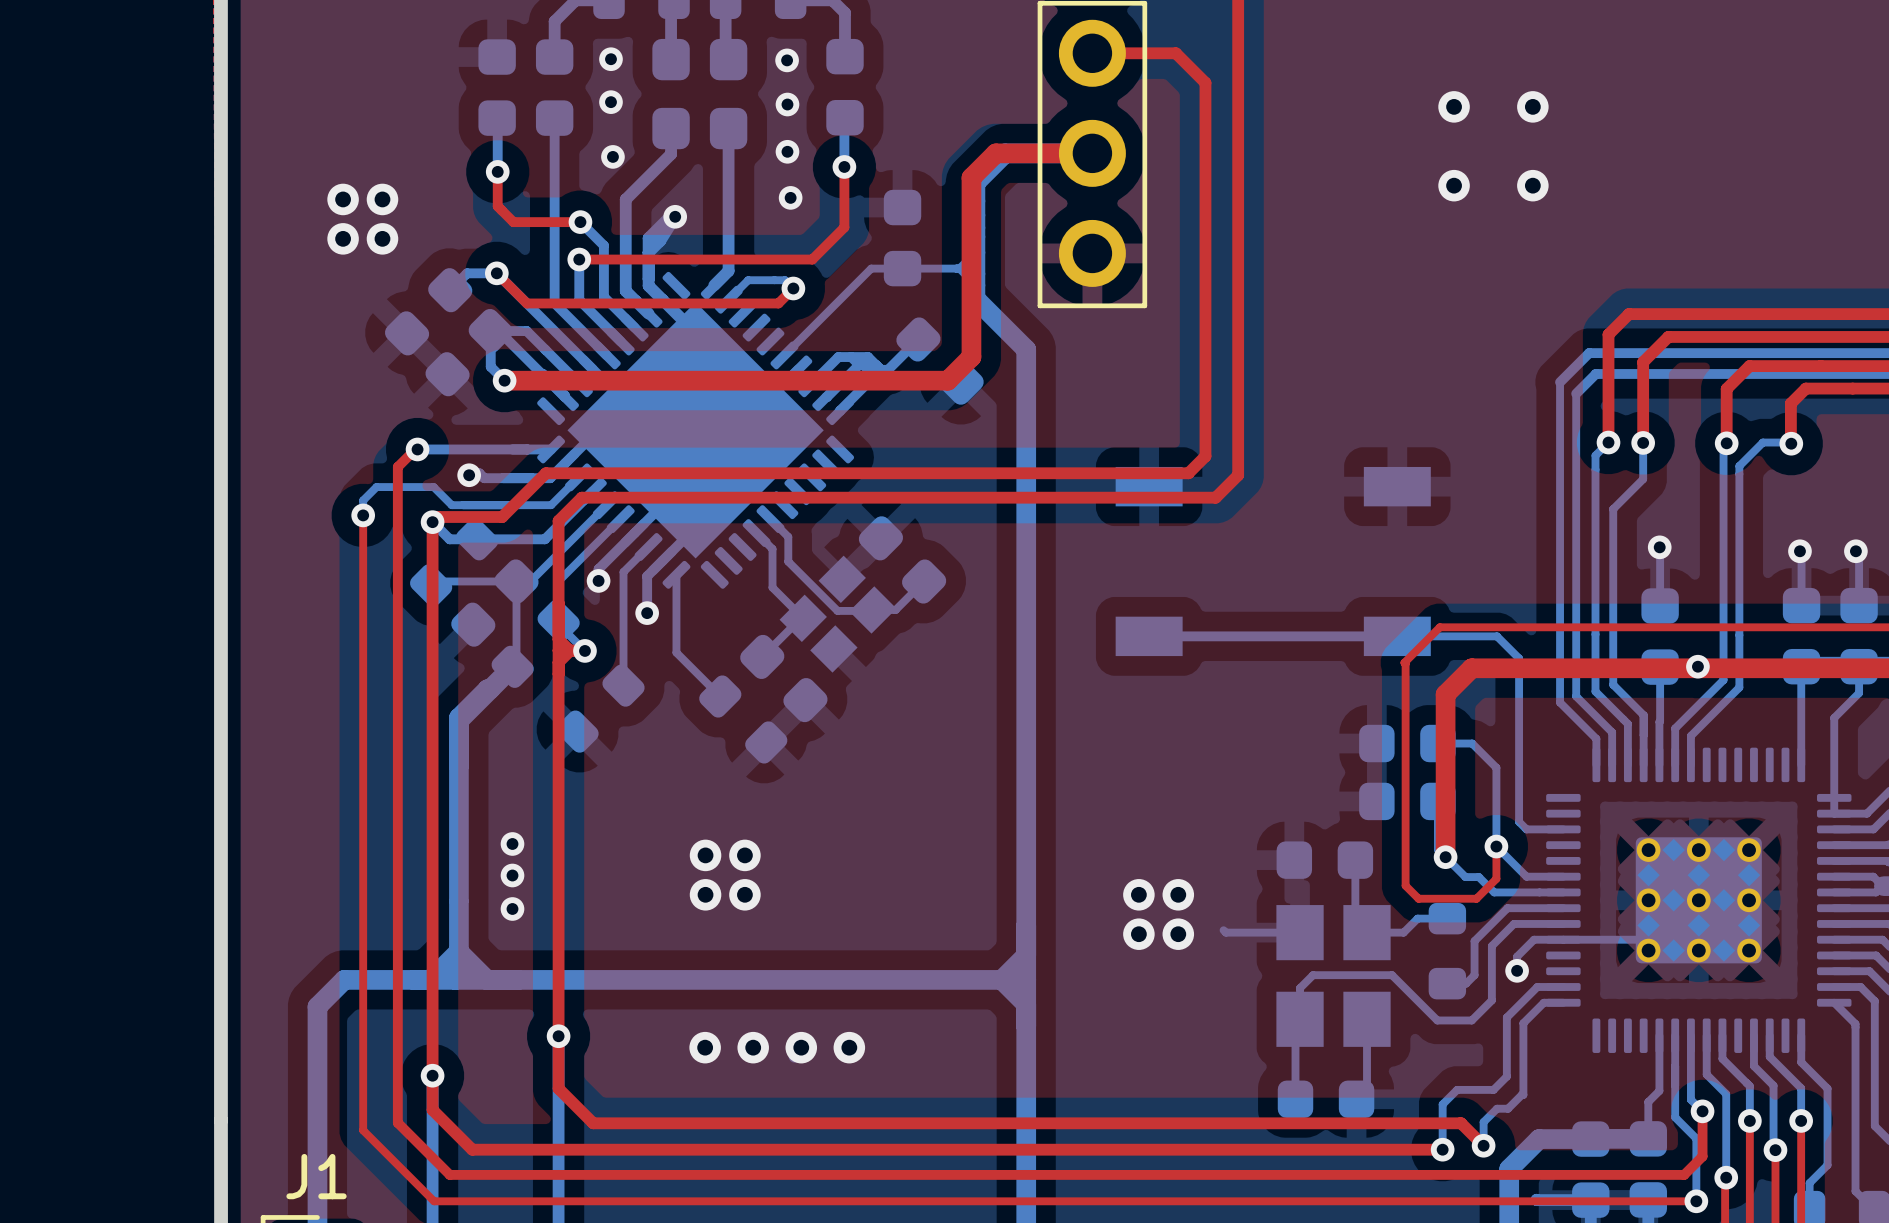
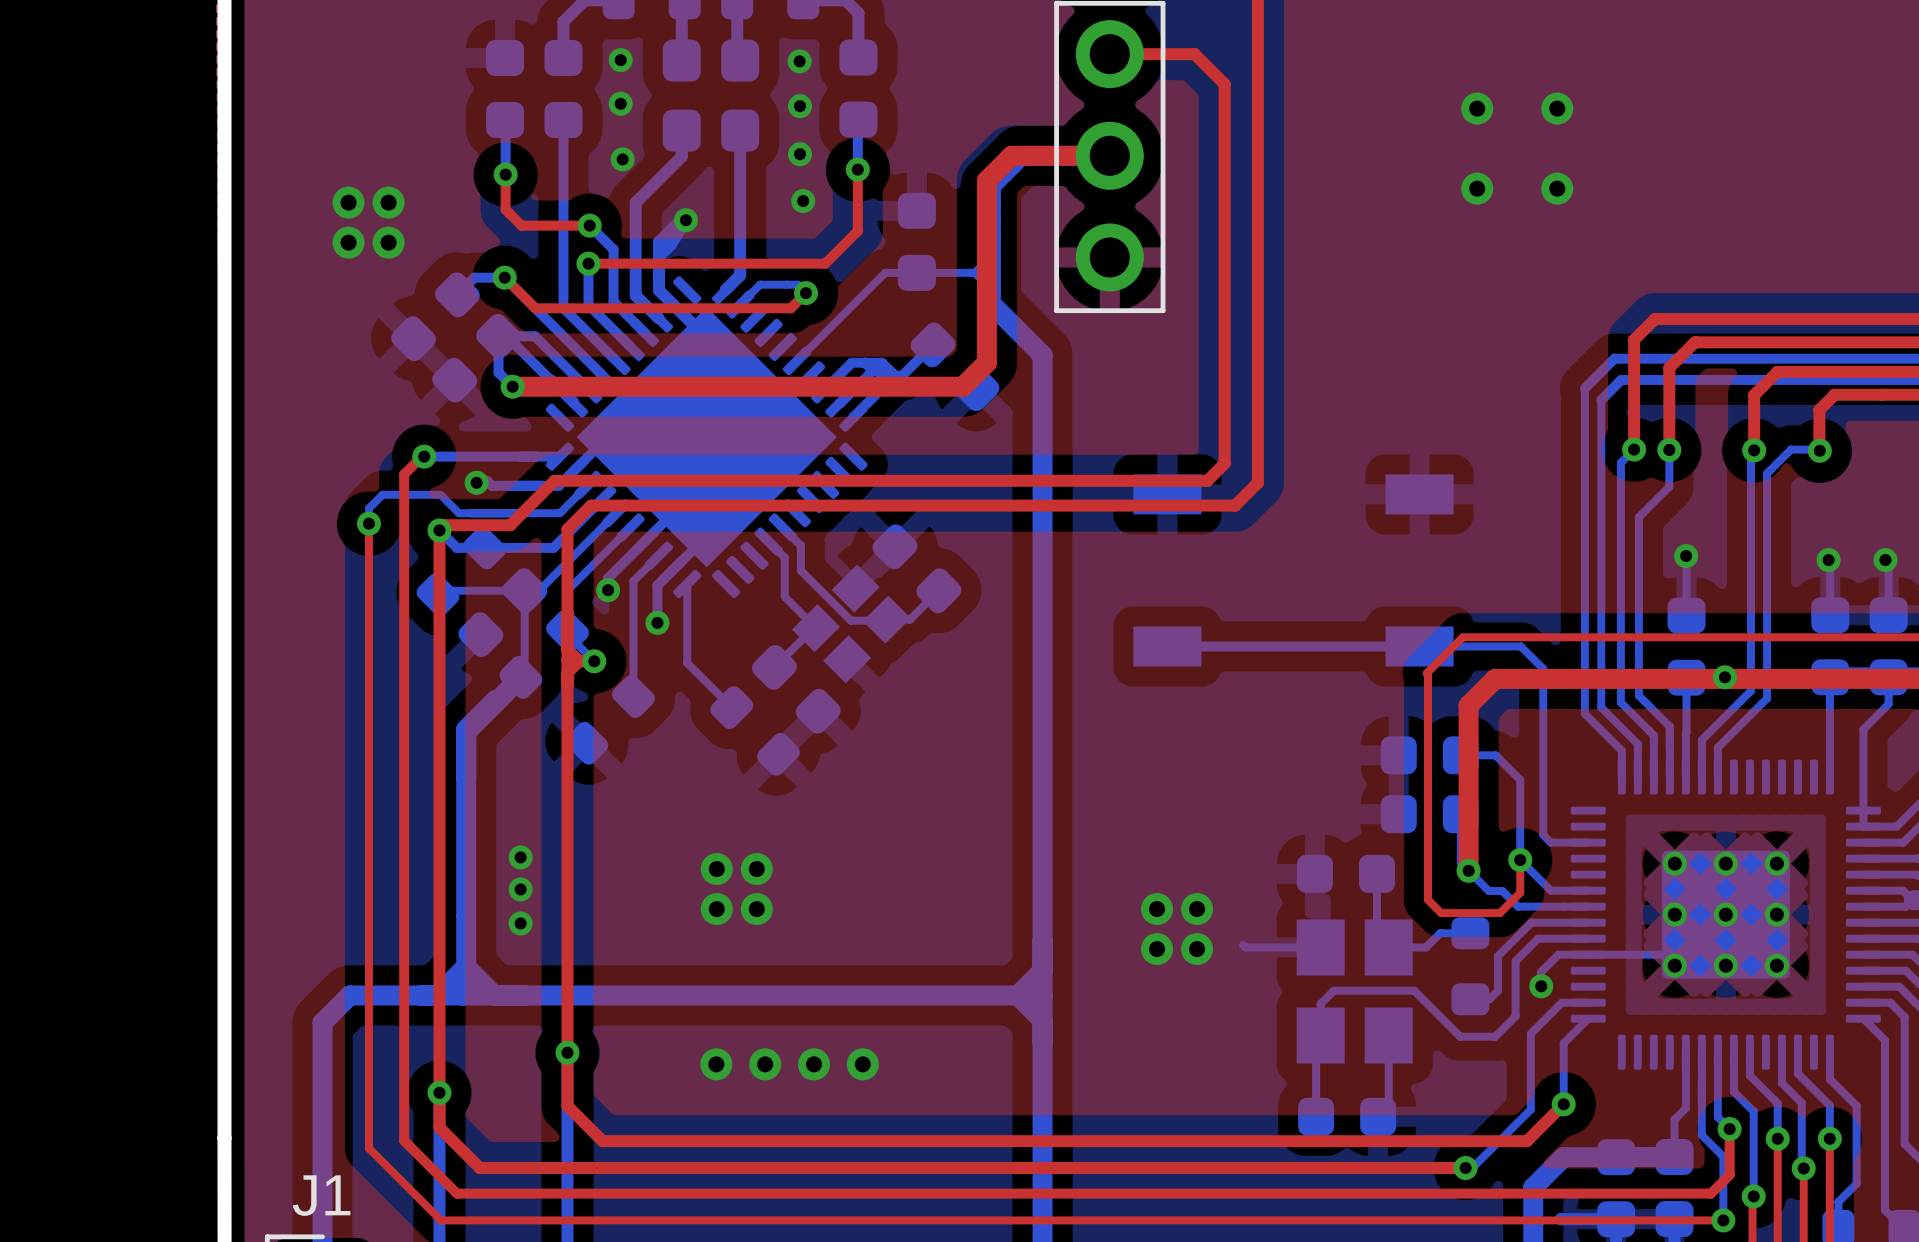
bottom track: (1563, 1002) (1543, 1002) (1523, 1023) (1523, 1094) (1508, 1108) (1497, 1108) (1483, 1122) (1483, 1145) -> (1588, 1018) (1563, 1043) (1563, 1104)
bottom track: (1506, 1076) (1493, 1089) (1457, 1089) (1442, 1104) (1442, 1149) -> (1530, 1093) (1530, 1109) (1472, 1168) (1465, 1168)
top track: (1461, 1123) (1483, 1145) -> (1484, 1141) (1526, 1141) (1563, 1104)
via position: (1483, 1145) -> (1563, 1104)

